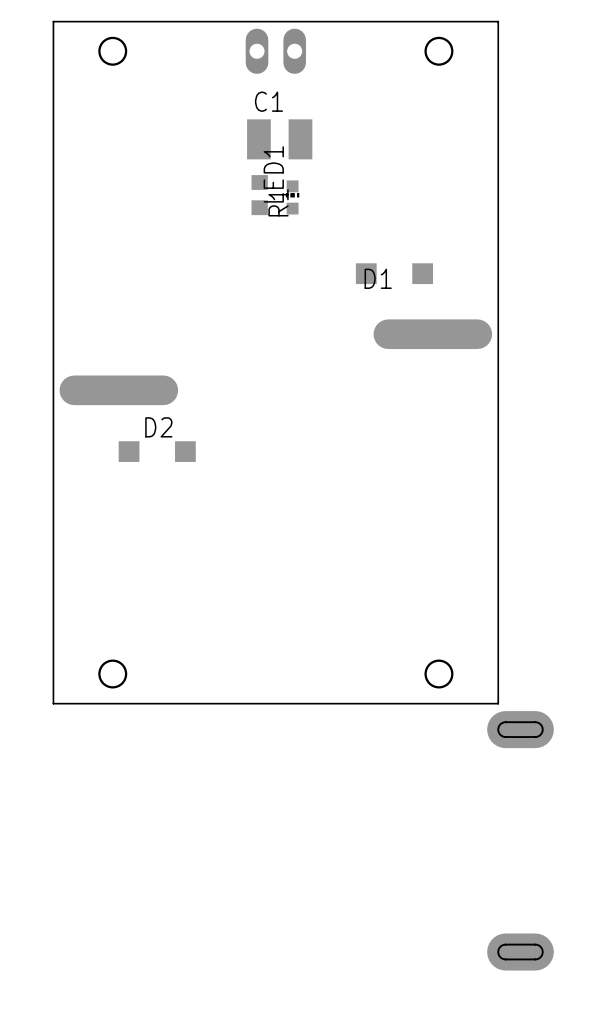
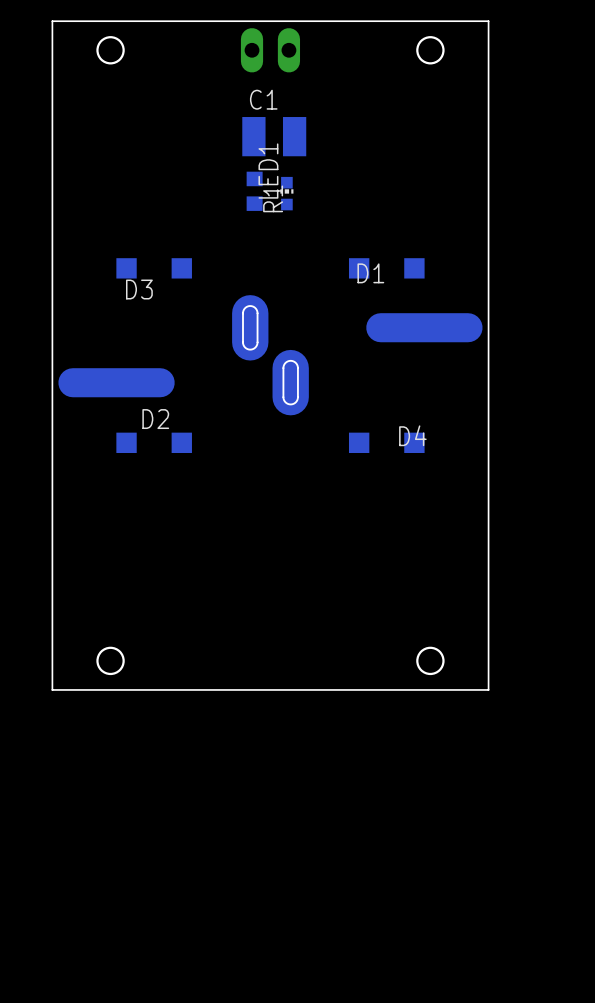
D3: none -> (154, 268)
part: none -> (250, 327)
part: none -> (290, 382)
D4: none -> (386, 442)
part: (520, 729) -> none
part: (520, 952) -> none

